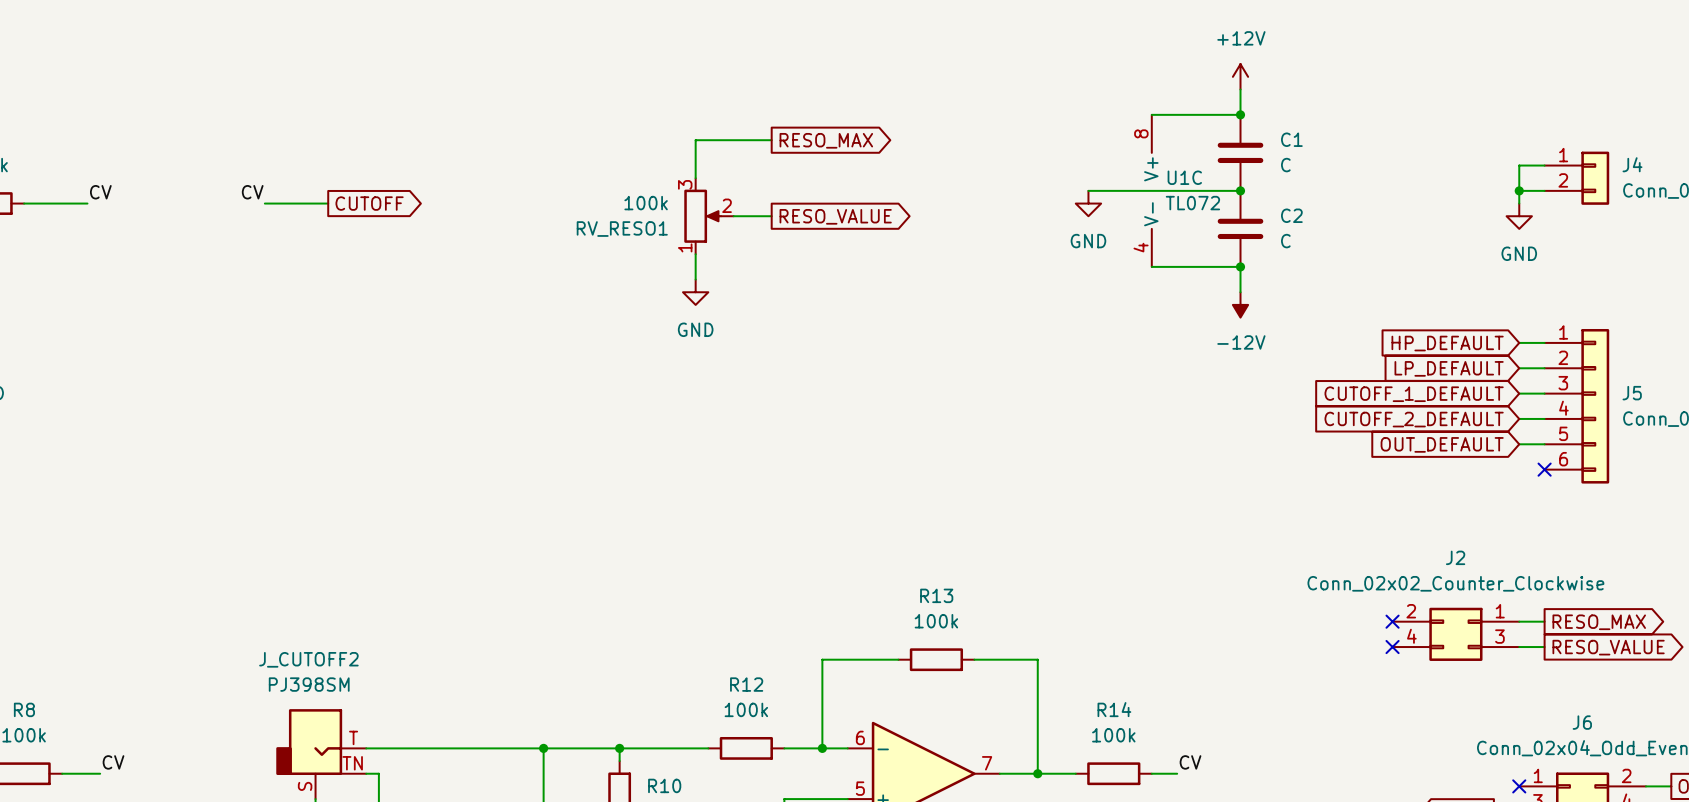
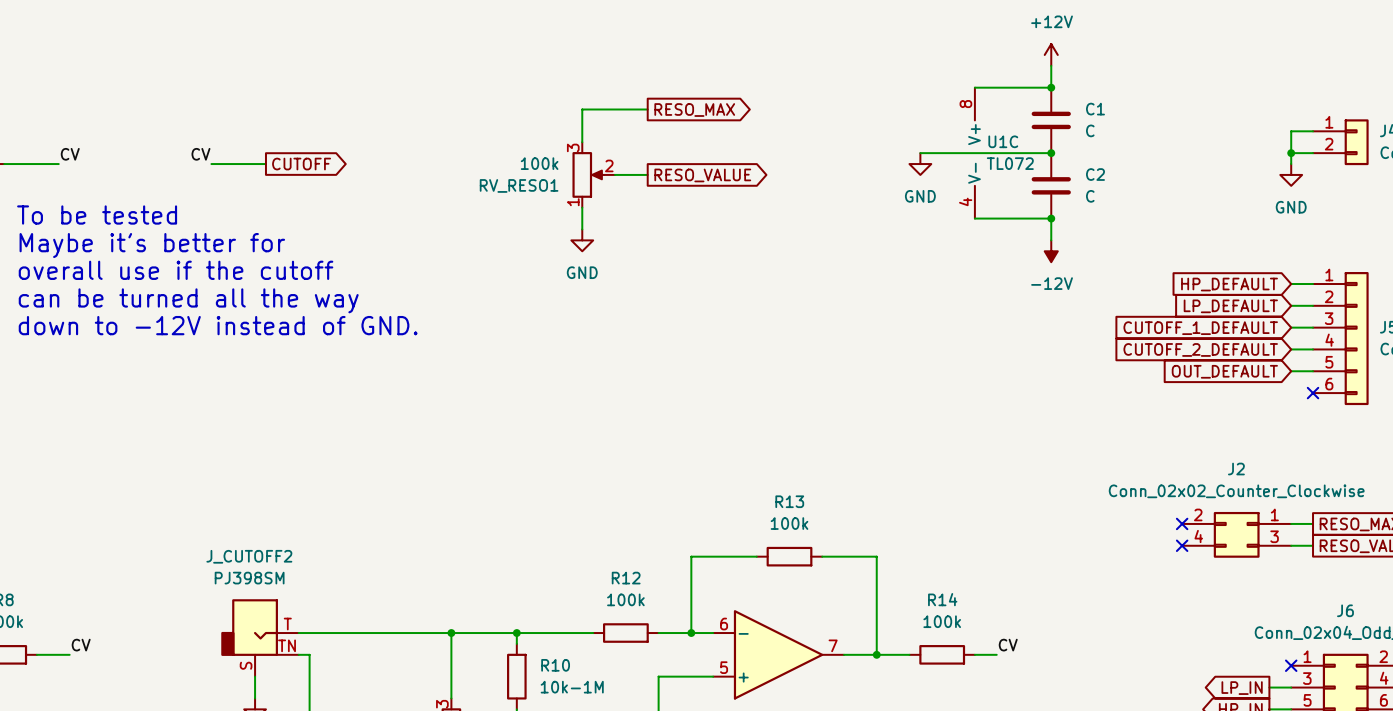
text: none -> To be tested (97, 215)
text: none -> Maybe it's better for (152, 245)
text: none -> overall use if the cutoff (176, 270)
text: none -> can be turned all the way (188, 300)
text: none -> down to -12V instead of GND. (218, 325)

